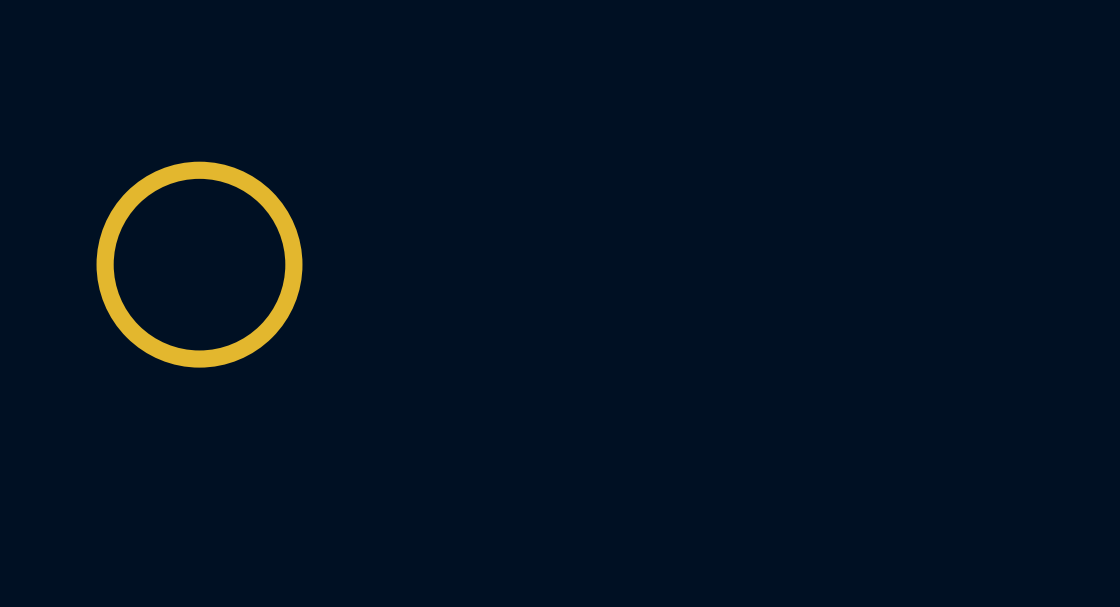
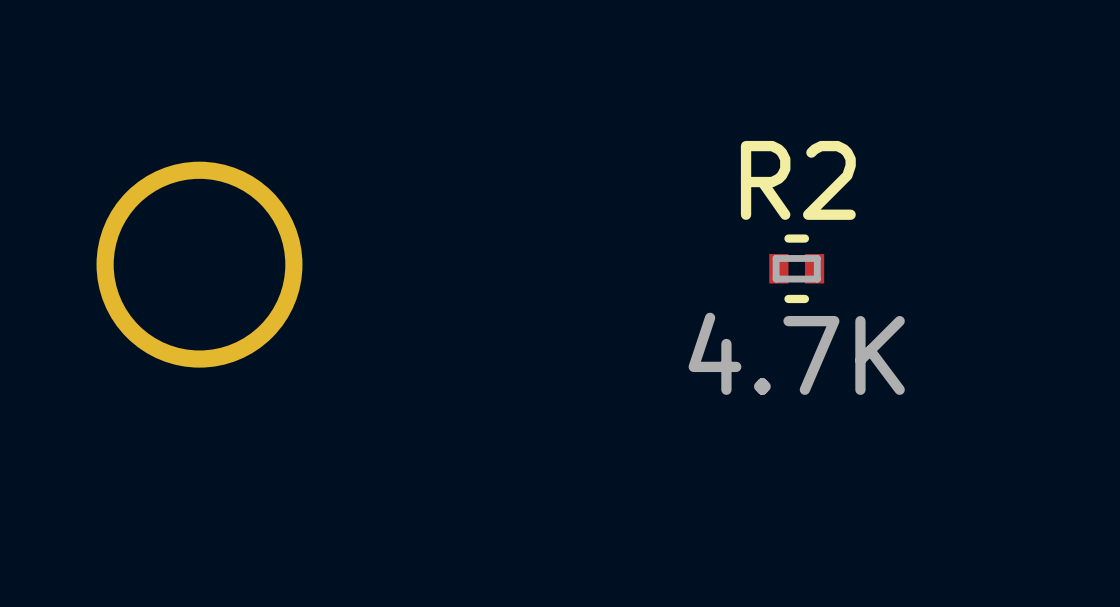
R2: none -> 4.7K (796, 268)

